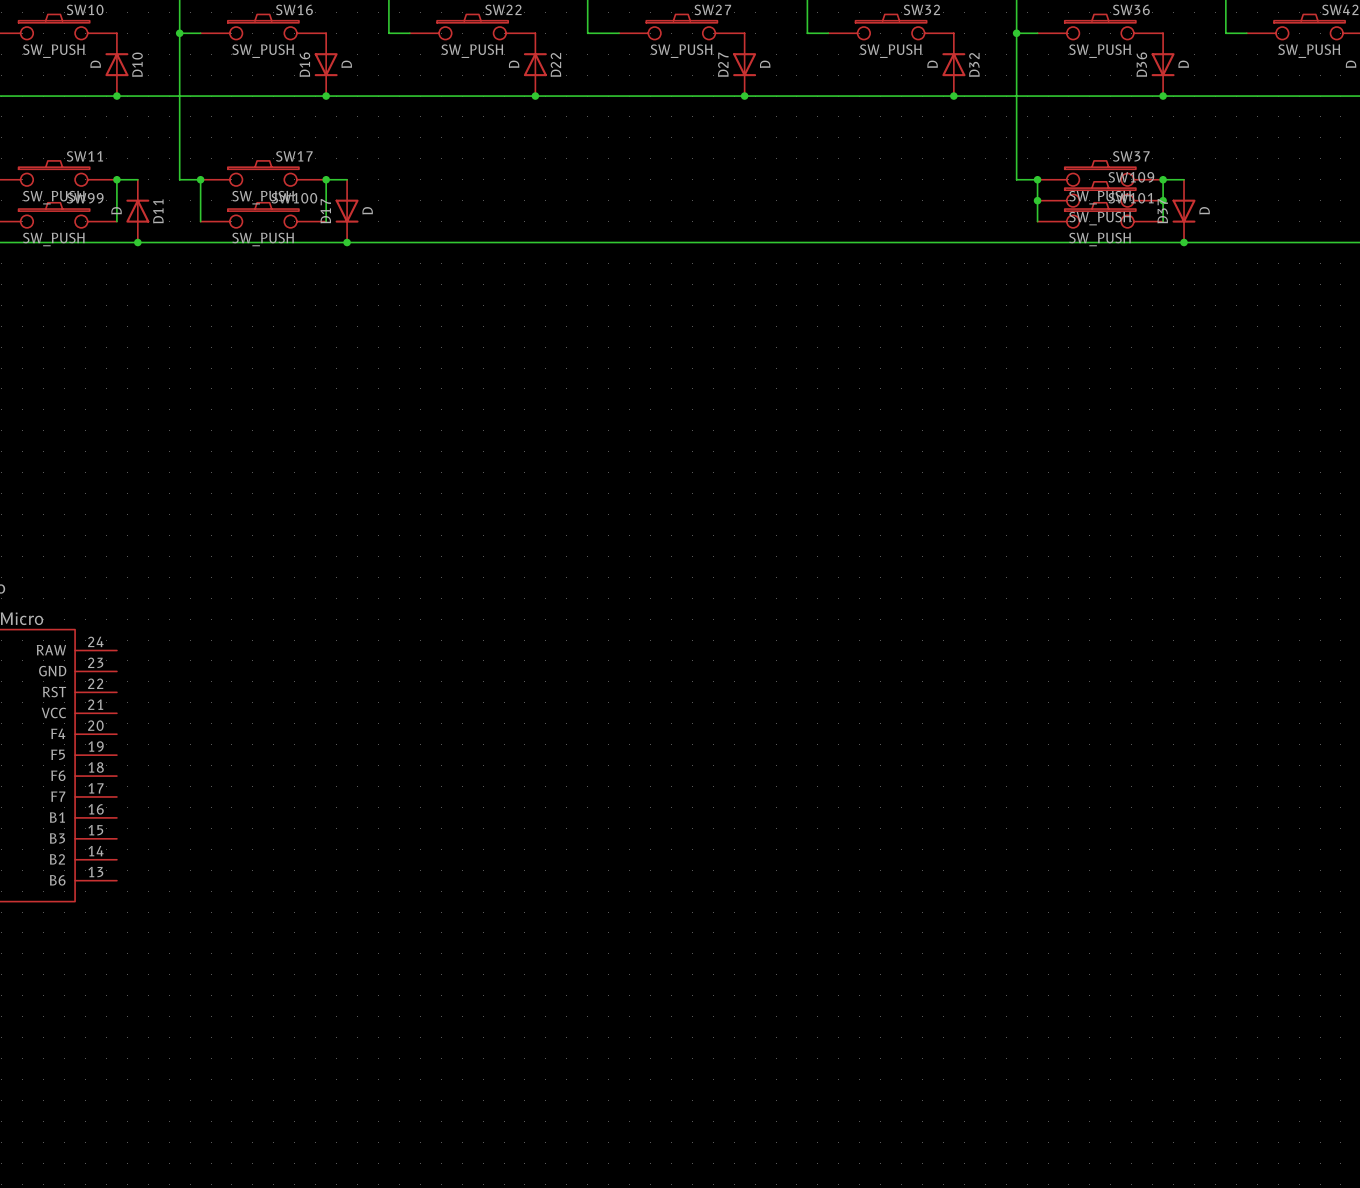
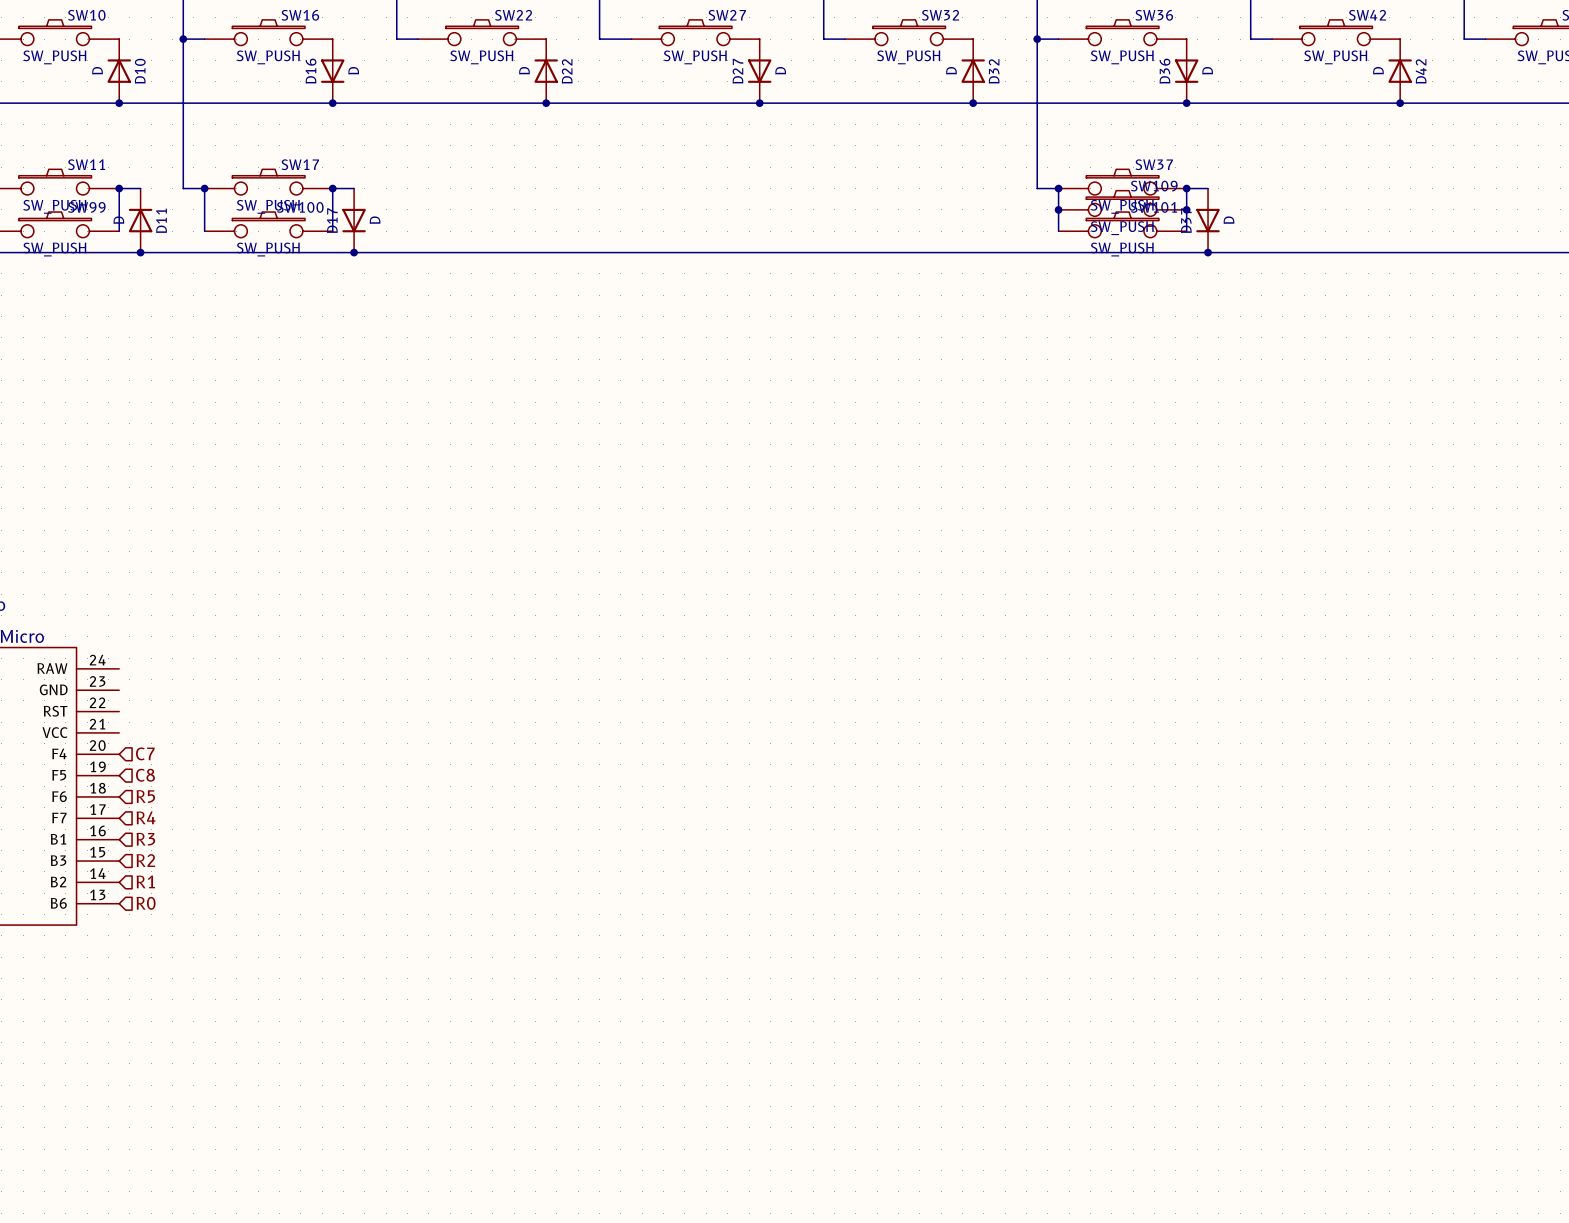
hierarchical label: none -> C7 (145, 753)
hierarchical label: none -> C8 (145, 775)
hierarchical label: none -> R5 (145, 796)
hierarchical label: none -> R4 (146, 817)
hierarchical label: none -> R3 (145, 839)
hierarchical label: none -> R2 (145, 860)
hierarchical label: none -> R1 (145, 881)
hierarchical label: none -> R0 (146, 903)

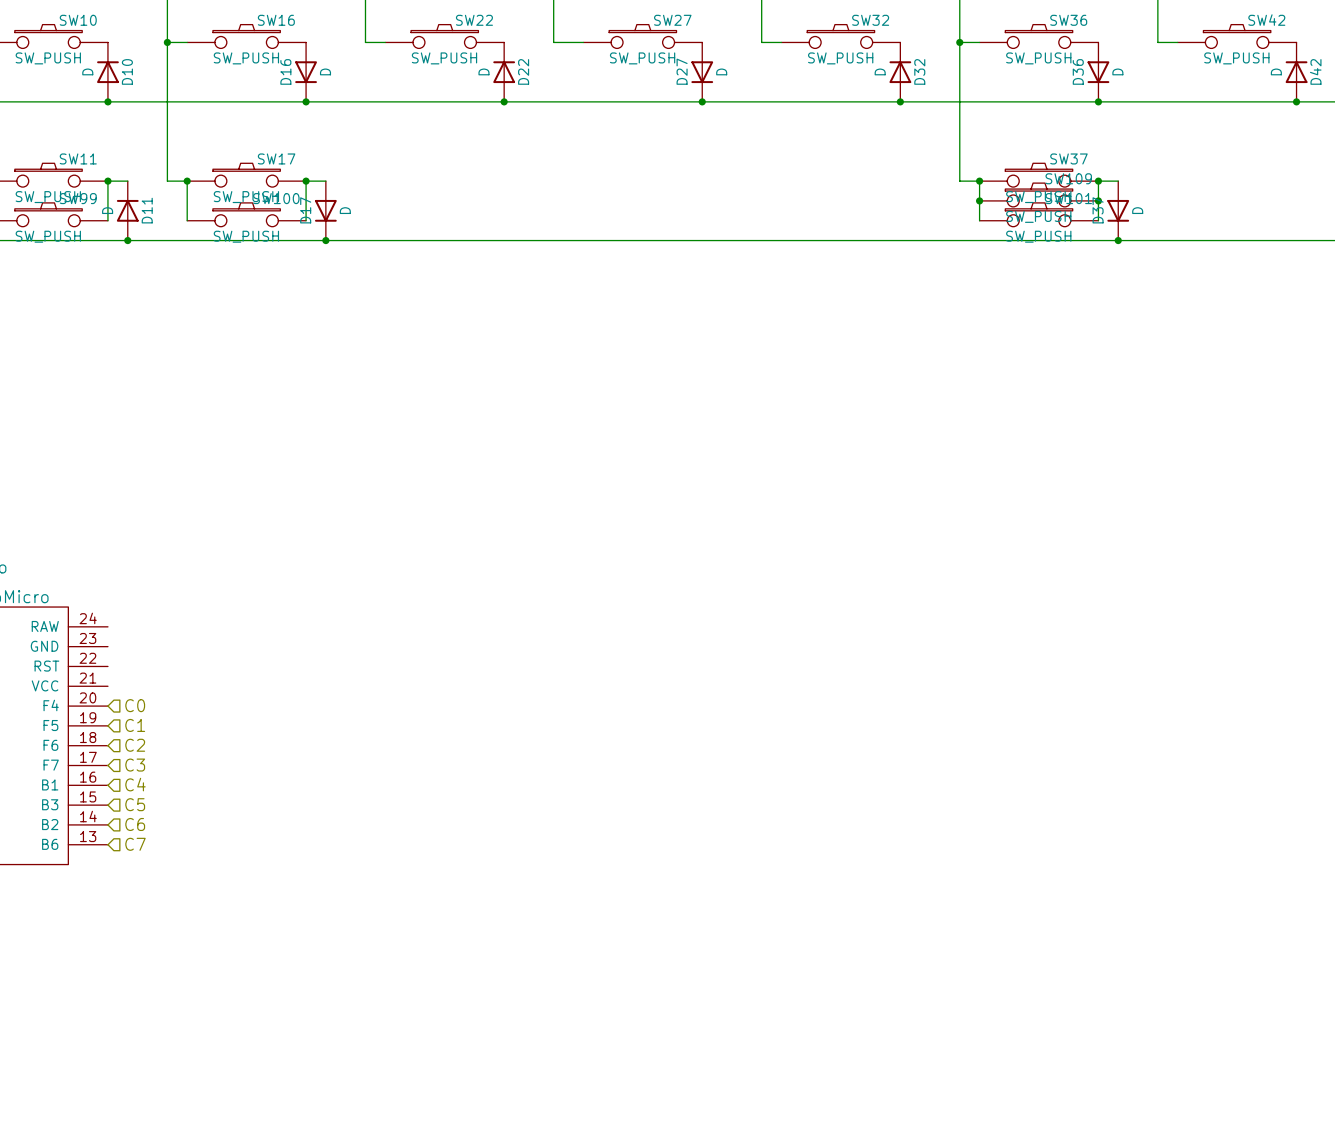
hierarchical label: C7 (145, 753) -> C0 (135, 705)
hierarchical label: C8 (145, 775) -> C1 (135, 725)
hierarchical label: R5 (145, 796) -> C2 (135, 745)
hierarchical label: R4 (146, 817) -> C3 (135, 765)
hierarchical label: R3 (145, 839) -> C4 (135, 784)
hierarchical label: R2 (145, 860) -> C5 (135, 804)
hierarchical label: R1 (145, 881) -> C6 (135, 824)
hierarchical label: R0 (146, 903) -> C7 (135, 844)

